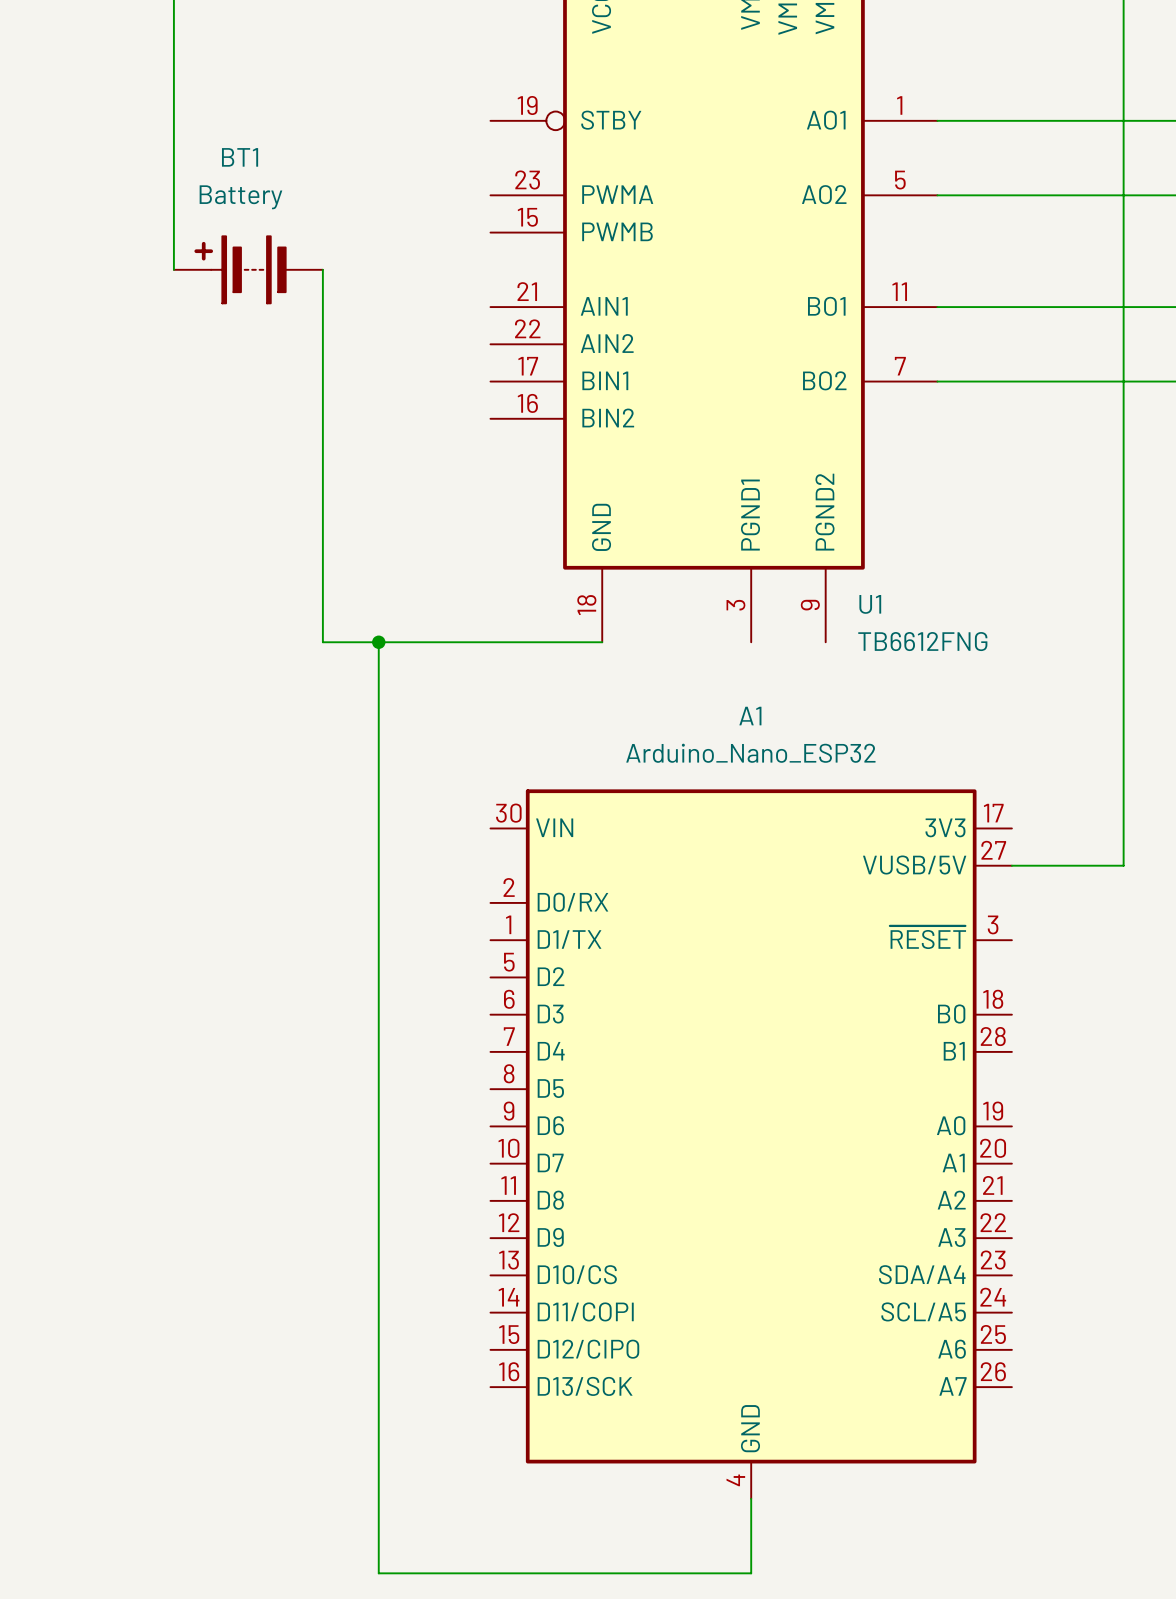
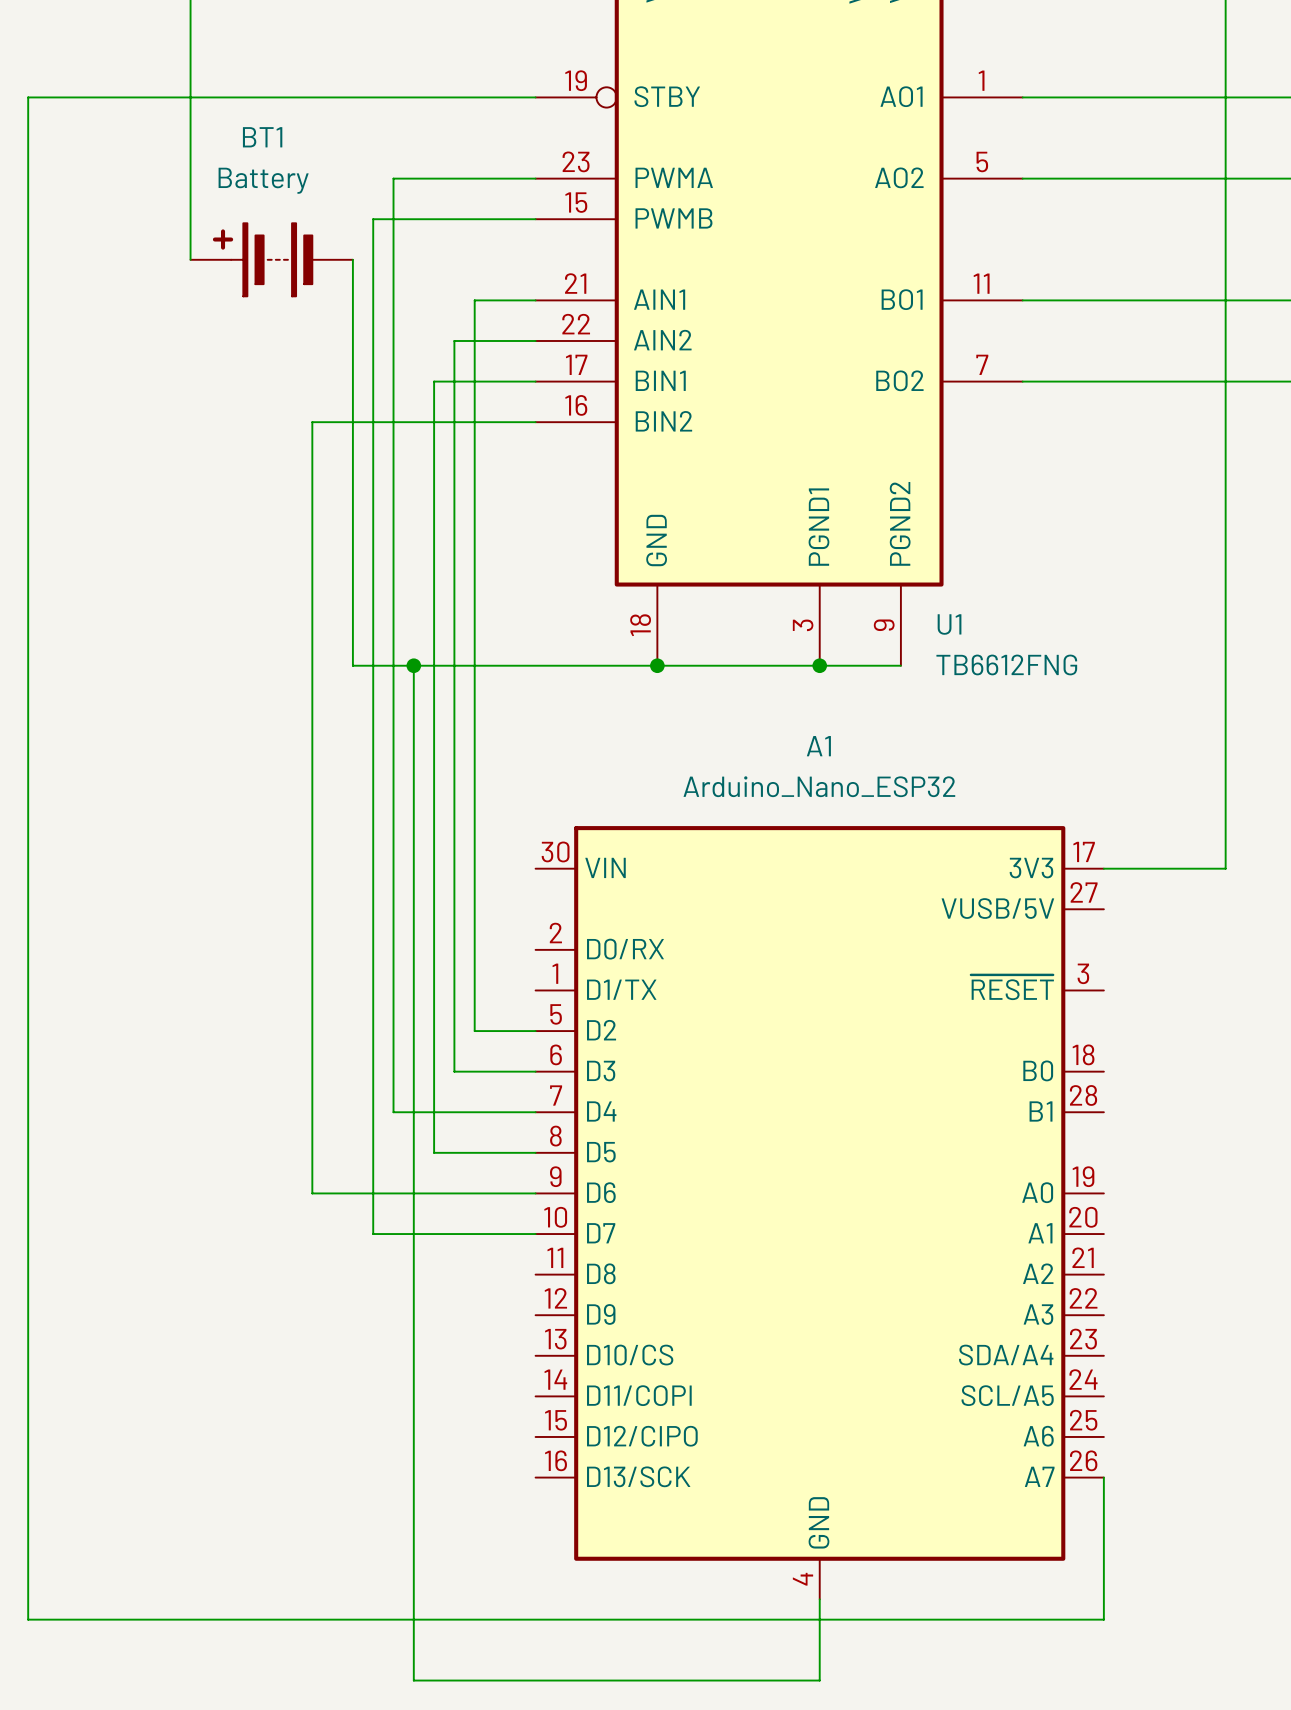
wire: none -> (535, 97) (28, 97) (28, 1619) (1103, 1619) (1103, 1477)
wire: none -> (535, 178) (393, 178) (393, 1112) (535, 1112)
wire: none -> (535, 219) (373, 219) (373, 1234) (535, 1234)
wire: none -> (535, 300) (474, 300) (474, 1031) (535, 1031)
wire: none -> (535, 340) (454, 340) (454, 1071) (535, 1071)
wire: none -> (535, 381) (434, 381) (434, 1152) (535, 1152)
wire: none -> (535, 422) (312, 422) (312, 1193) (535, 1193)
wire: none -> (657, 665) (900, 665)
junction: none -> (657, 665)
junction: none -> (819, 665)
wire: (1123, 828) (1123, 865) (1011, 865) -> (1225, 868) (1103, 868)

